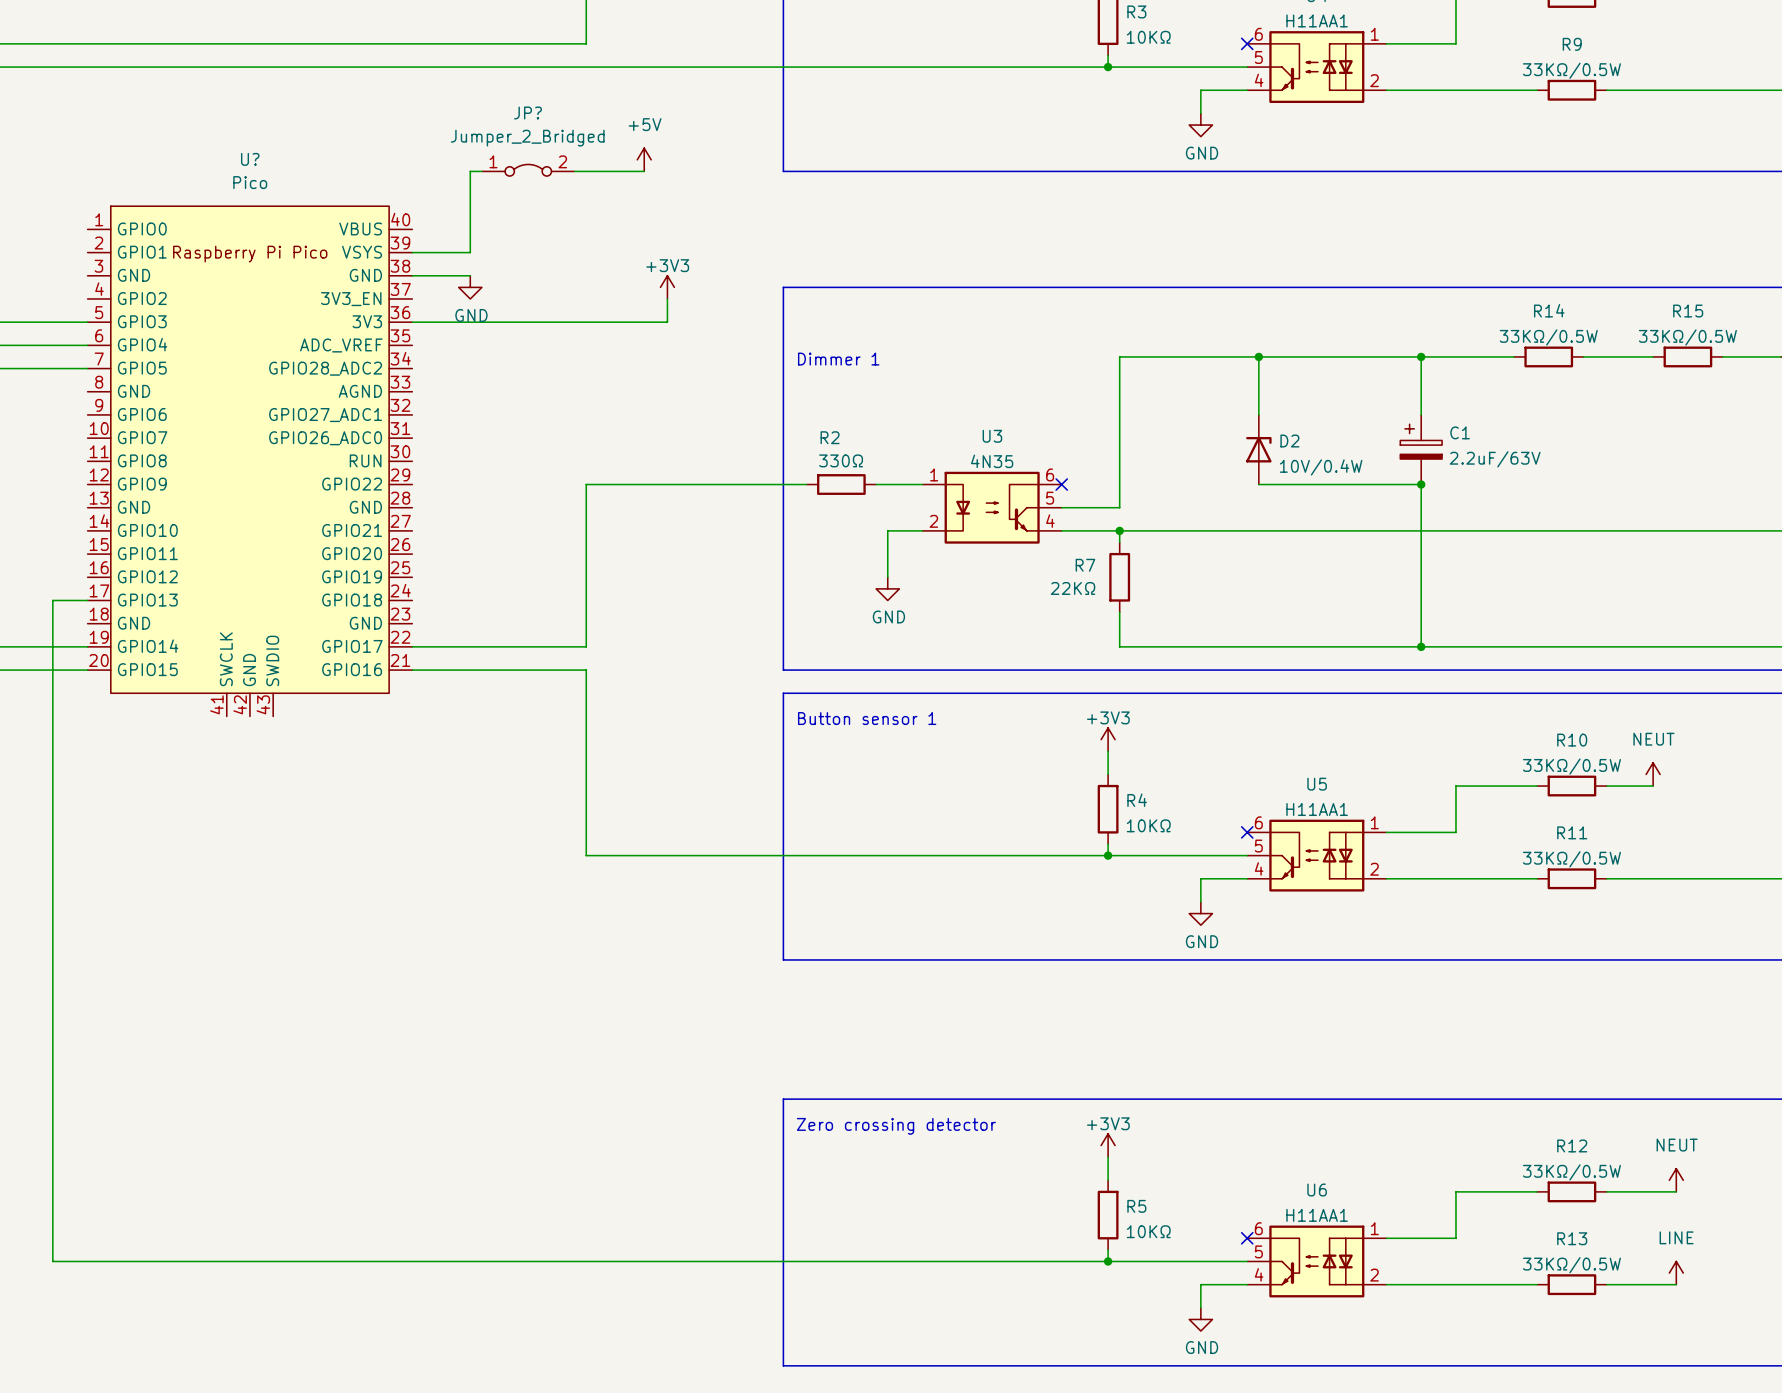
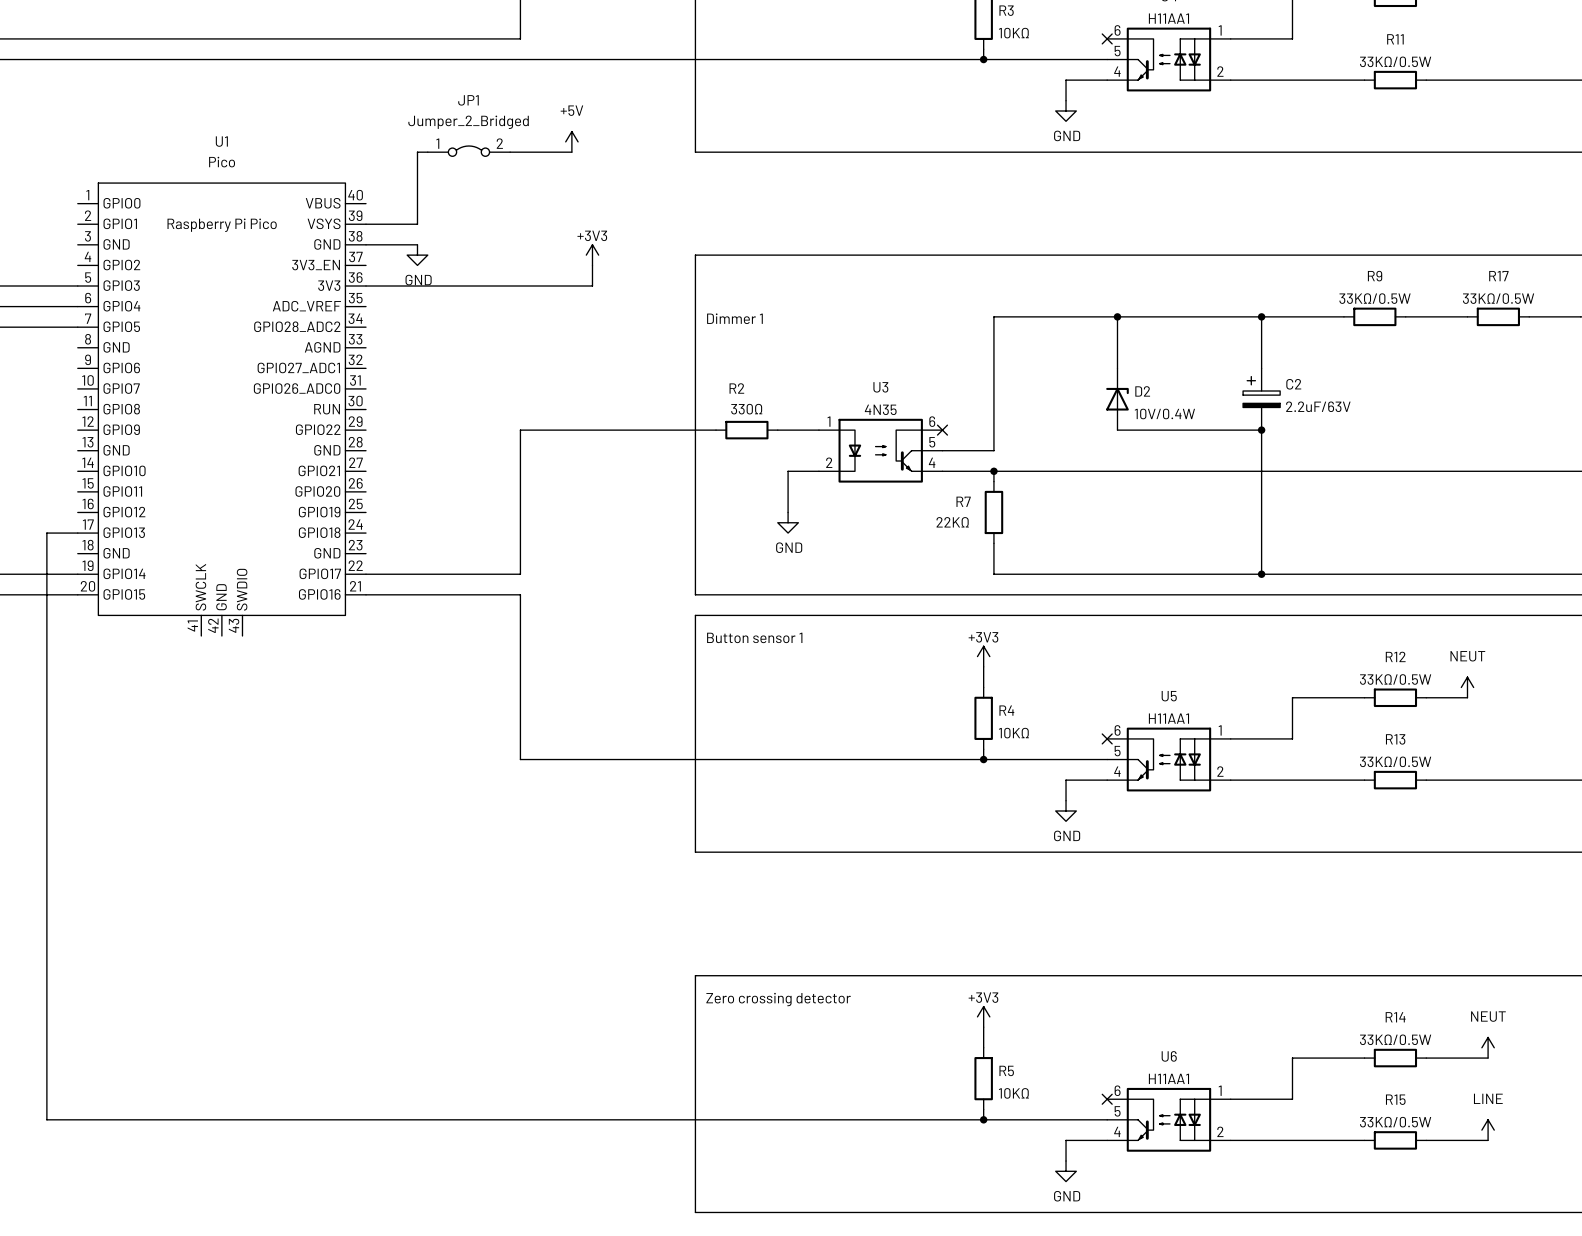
R9 name: R9 (1572, 44) -> R11 (1395, 39)
JP? name: JP? (528, 113) -> JP1 (468, 100)
U? name: U? (250, 159) -> U1 (221, 141)
R14 name: R14 (1549, 310) -> R9 (1375, 276)
R15 name: R15 (1688, 311) -> R17 (1498, 276)
C1 name: C1 (1460, 432) -> C2 (1293, 384)
R10 name: R10 (1572, 740) -> R12 (1395, 656)
R11 name: R11 (1572, 832) -> R13 (1395, 739)
R12 name: R12 (1572, 1145) -> R14 (1395, 1017)
R13 name: R13 (1572, 1238) -> R15 (1395, 1099)

